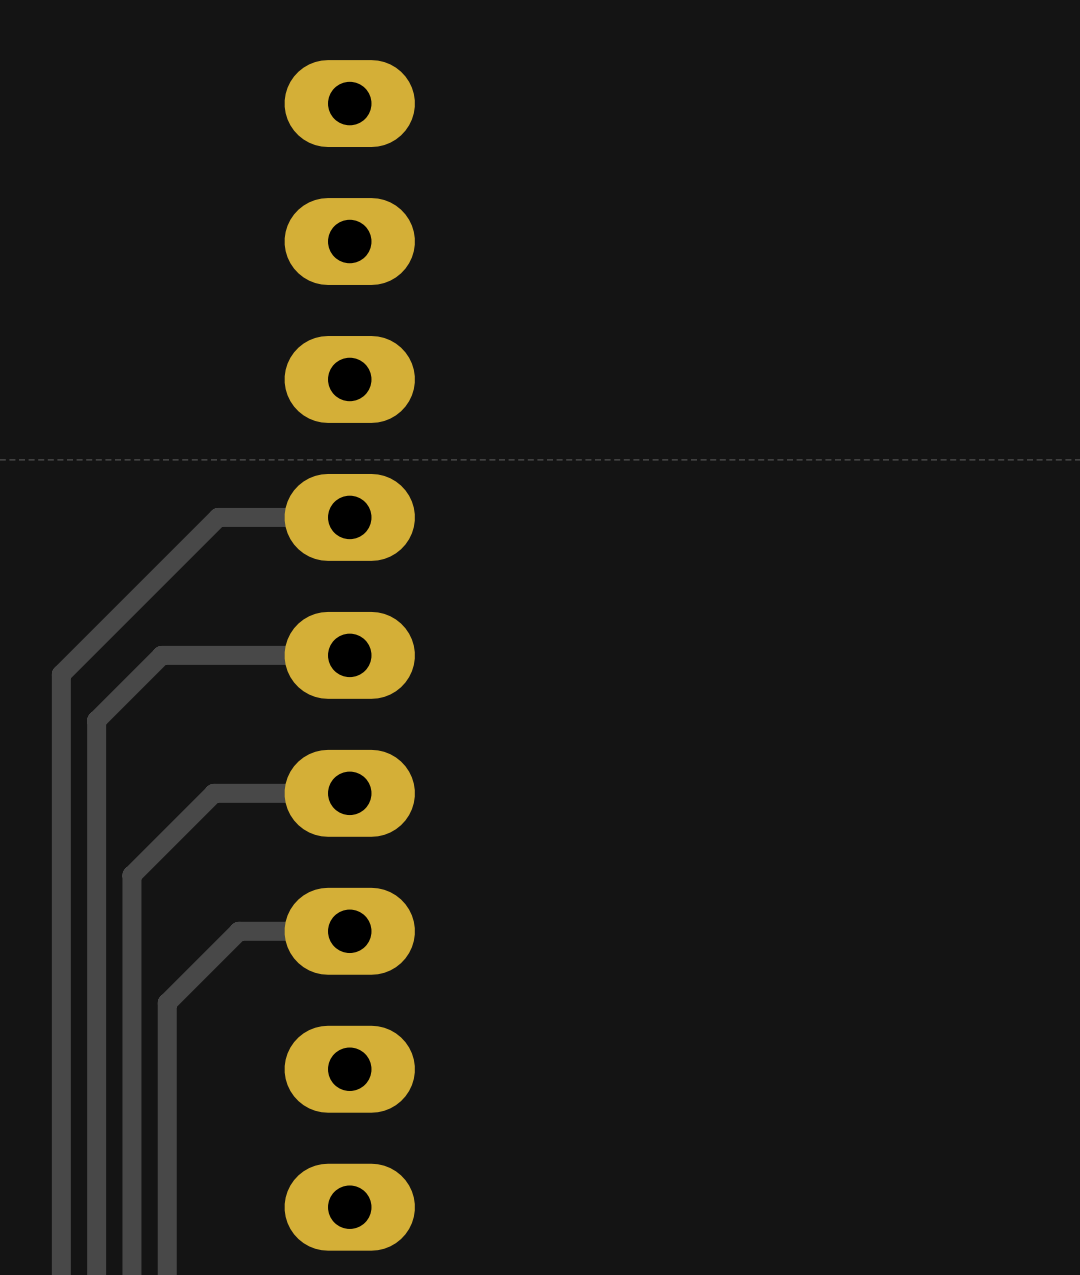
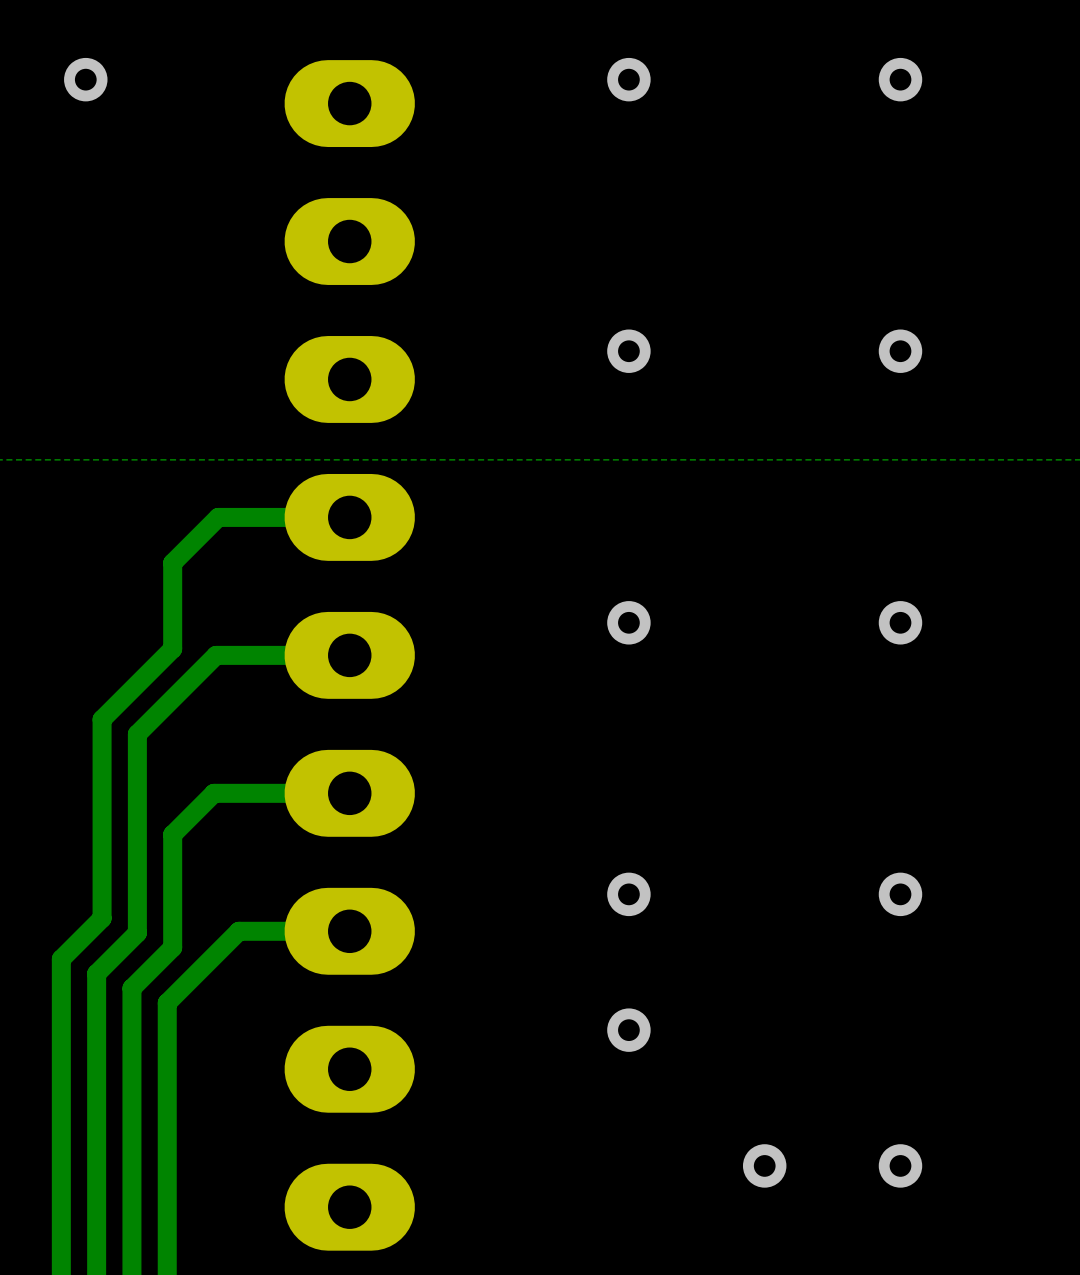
via: none -> (85, 79)
via: none -> (628, 79)
via: none -> (900, 79)
via: none -> (628, 351)
via: none -> (900, 351)
track: (172, 563) (61, 674) (61, 959) -> (172, 563) (172, 648) (102, 719) (102, 918) (61, 959)
via: none -> (628, 622)
via: none -> (900, 622)
track: (216, 655) (161, 655) (96, 720) (96, 973) -> (216, 655) (137, 734) (137, 933) (96, 973)
track: (172, 834) (131, 875) (131, 988) -> (172, 834) (172, 947) (131, 988)
via: none -> (628, 894)
via: none -> (900, 894)
via: none -> (628, 1030)
via: none -> (764, 1165)
via: none -> (900, 1165)

